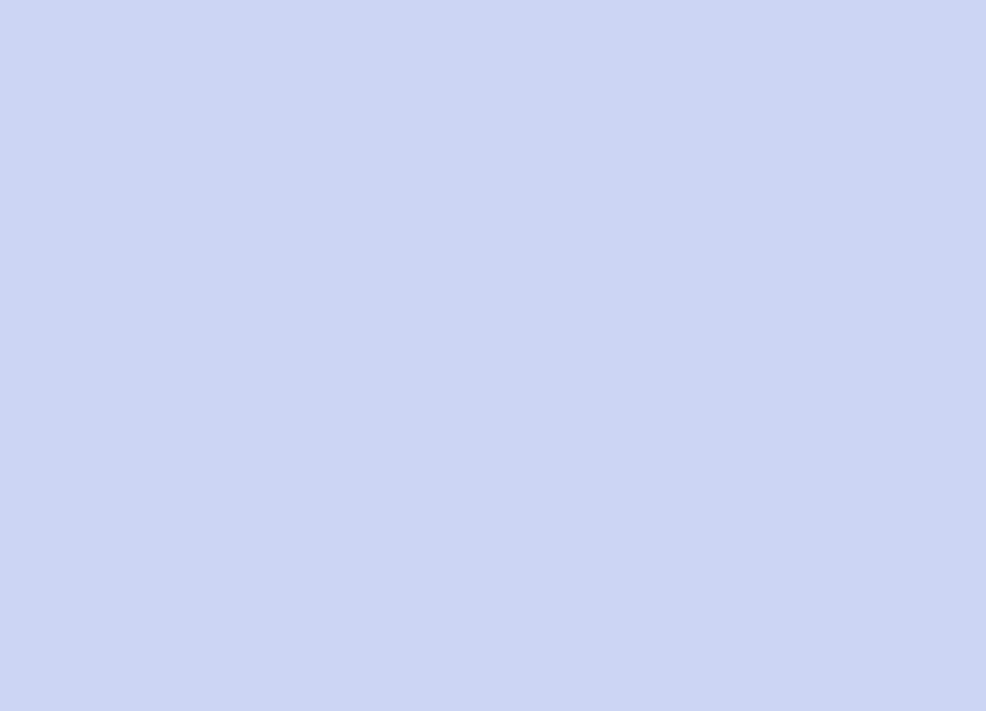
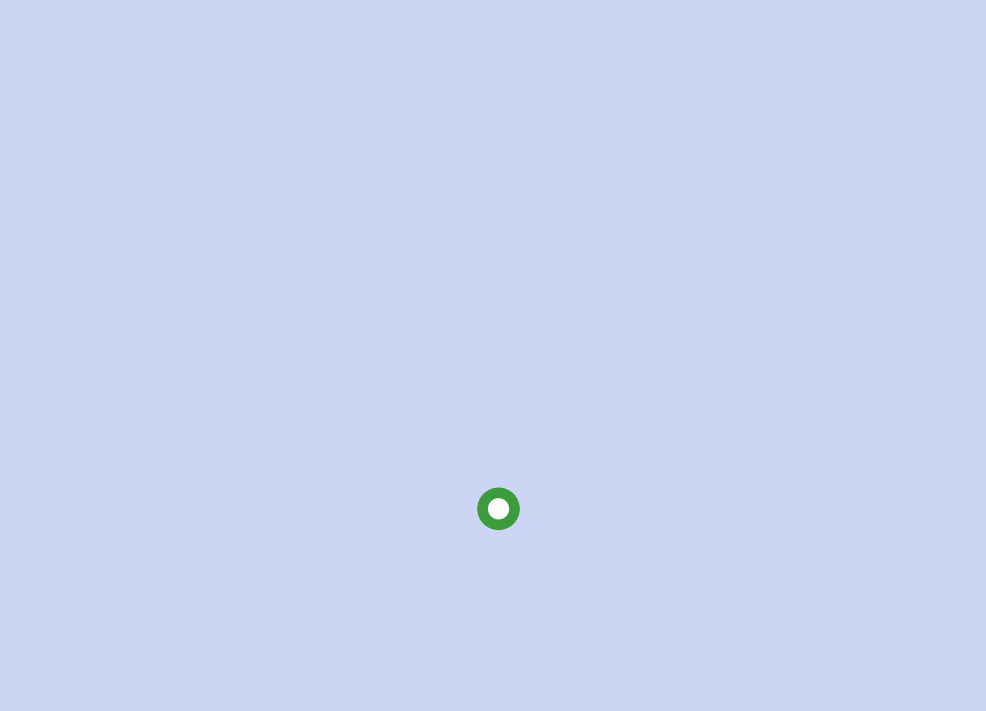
via: none -> (498, 508)

